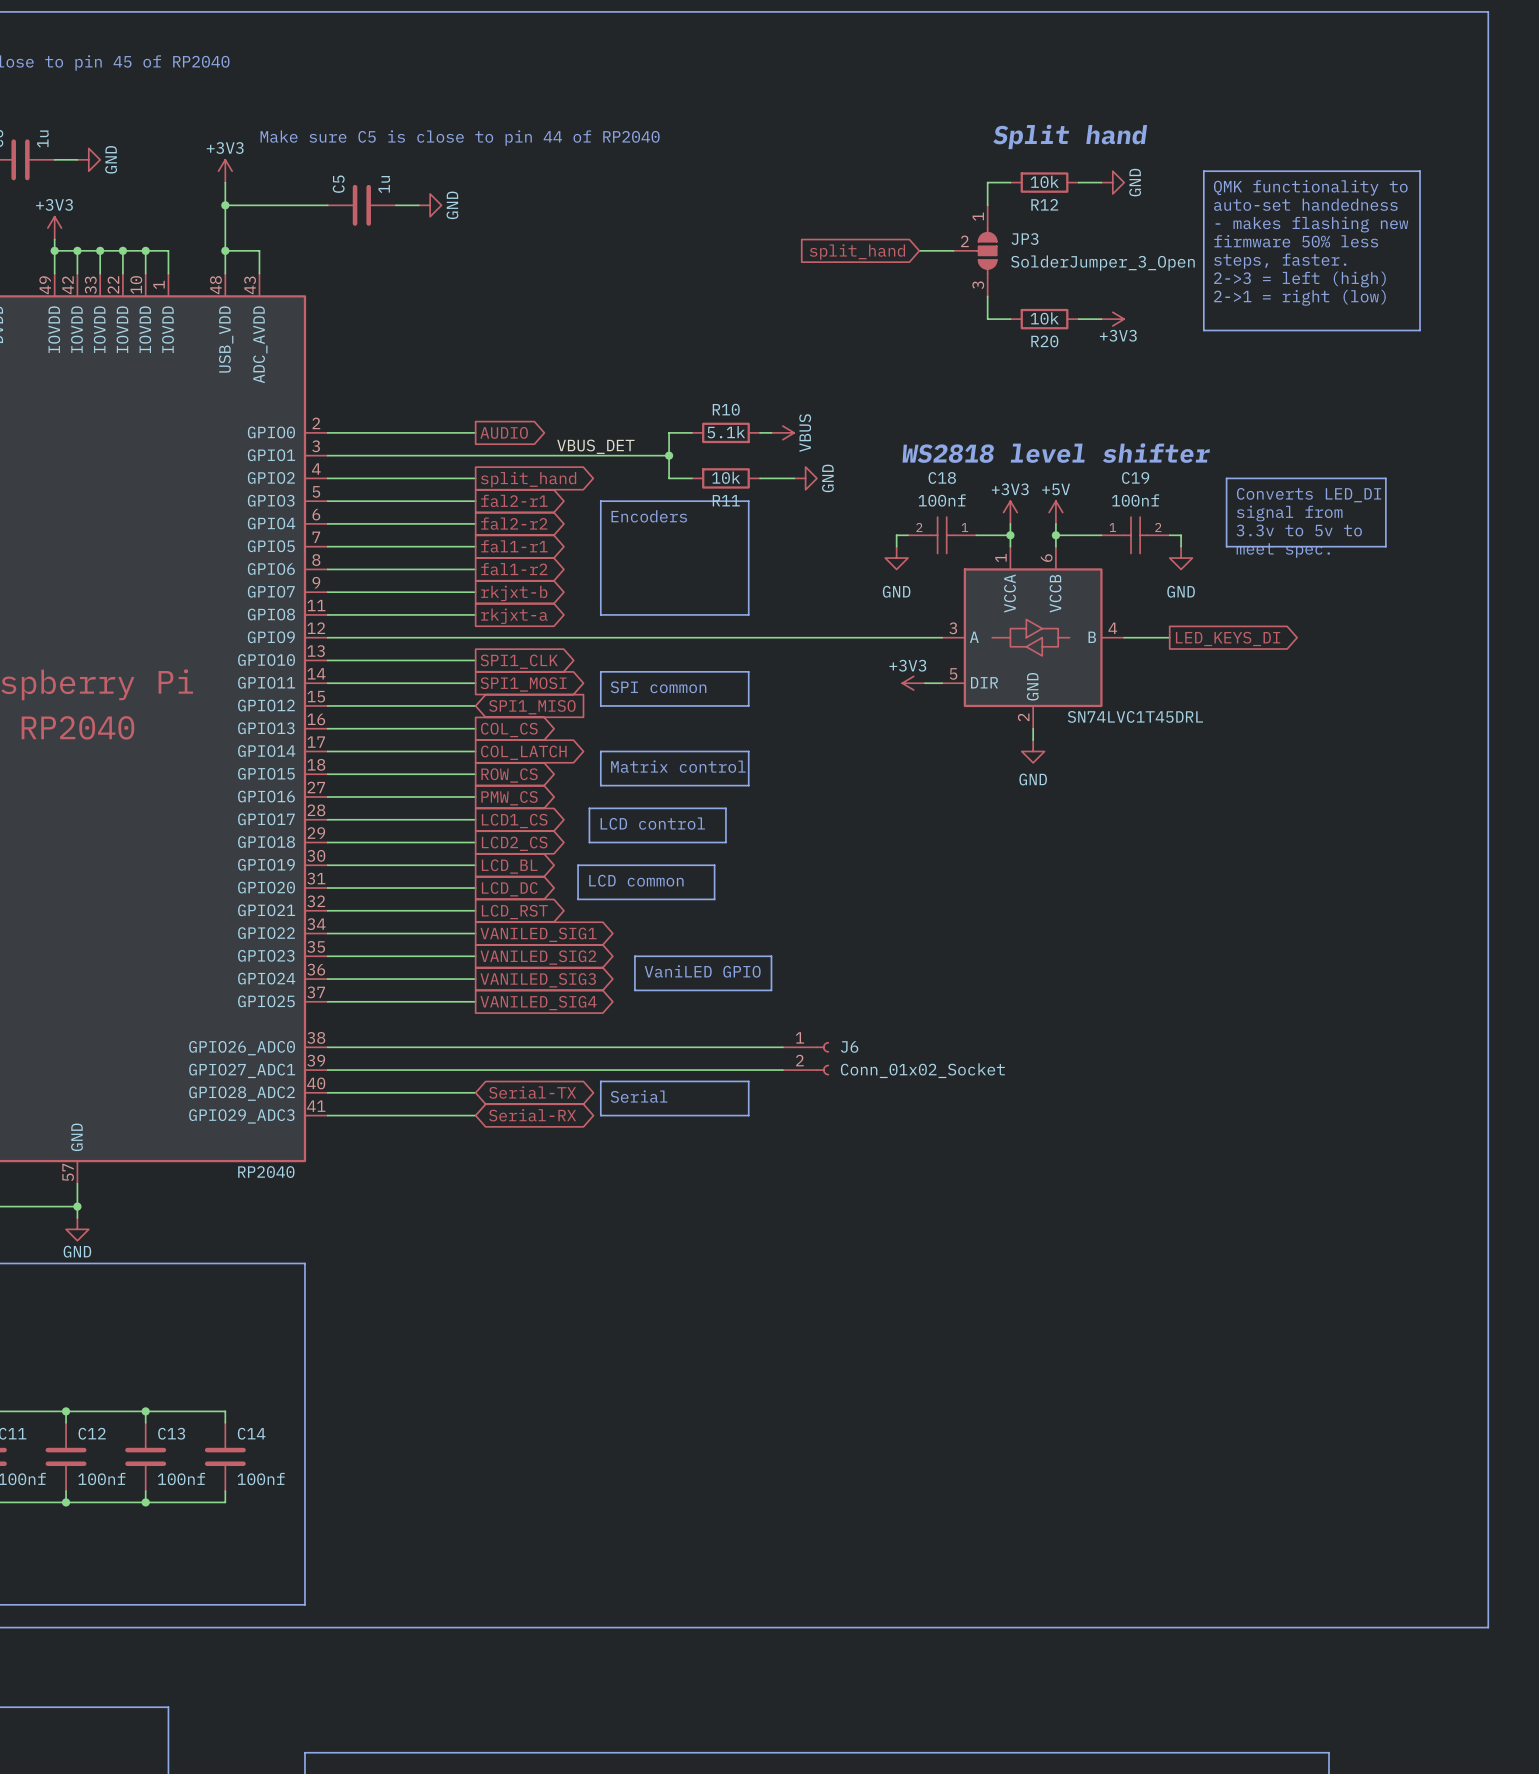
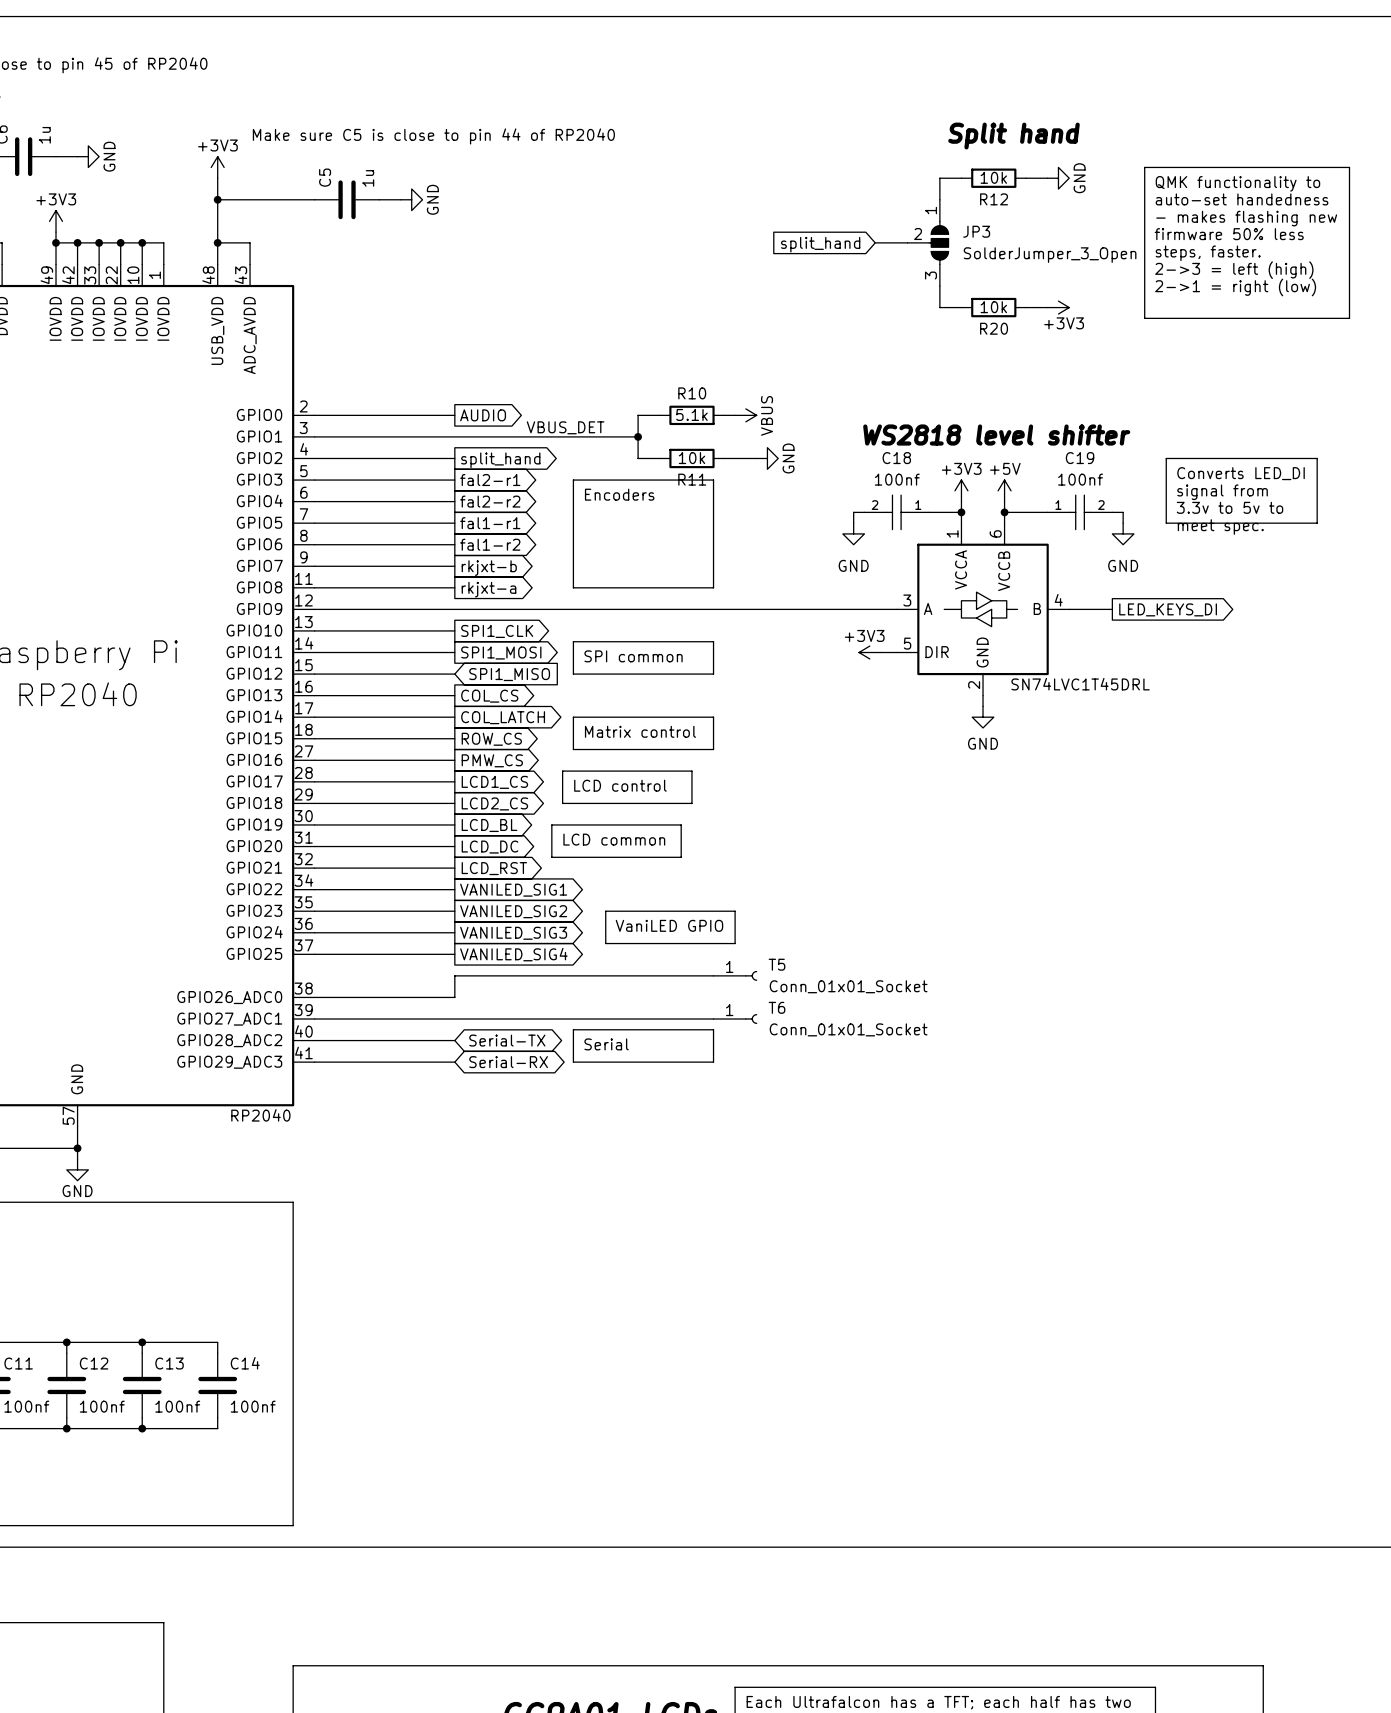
T5: none -> Conn_01x01_Socket (735, 975)
wire: (475, 1047) (782, 1047) -> (454, 997) (454, 975) (713, 975)
J6: Conn_01x02_Socket (805, 1058) -> none
T6: none -> Conn_01x01_Socket (735, 1019)

